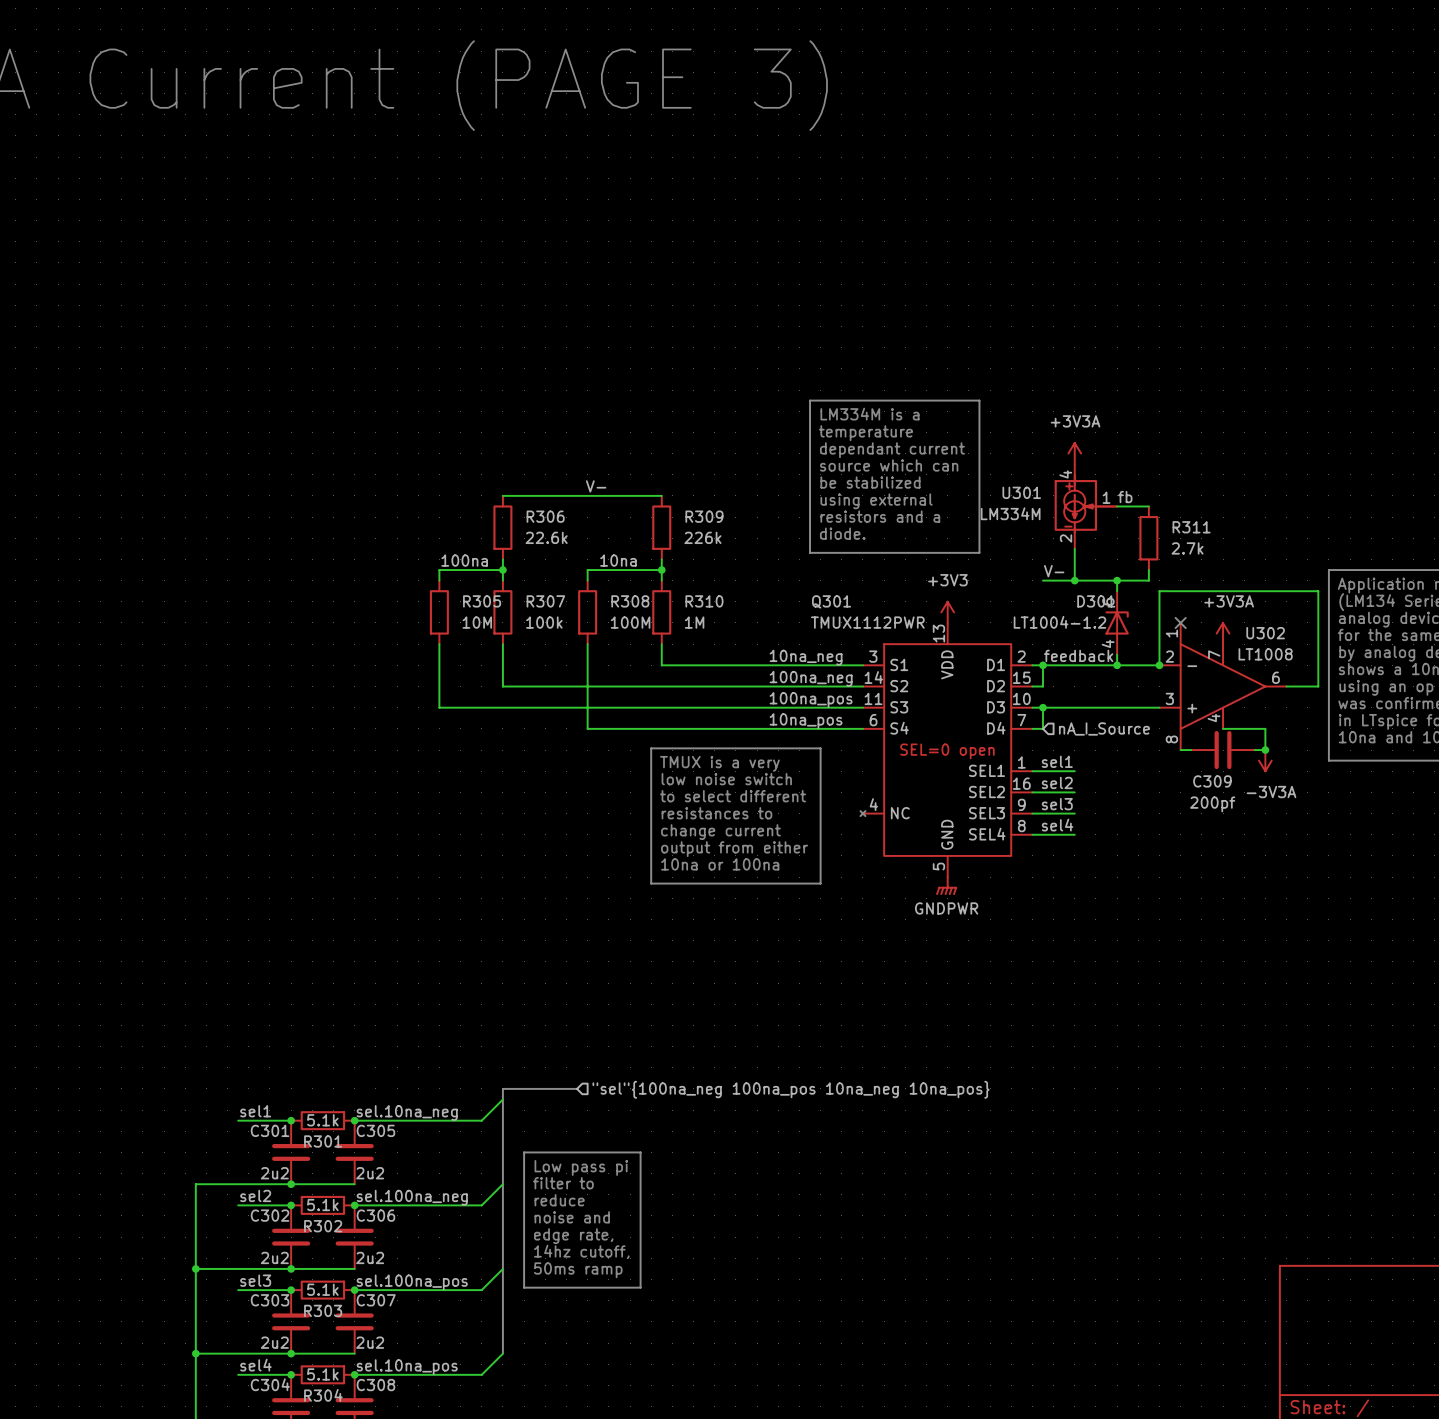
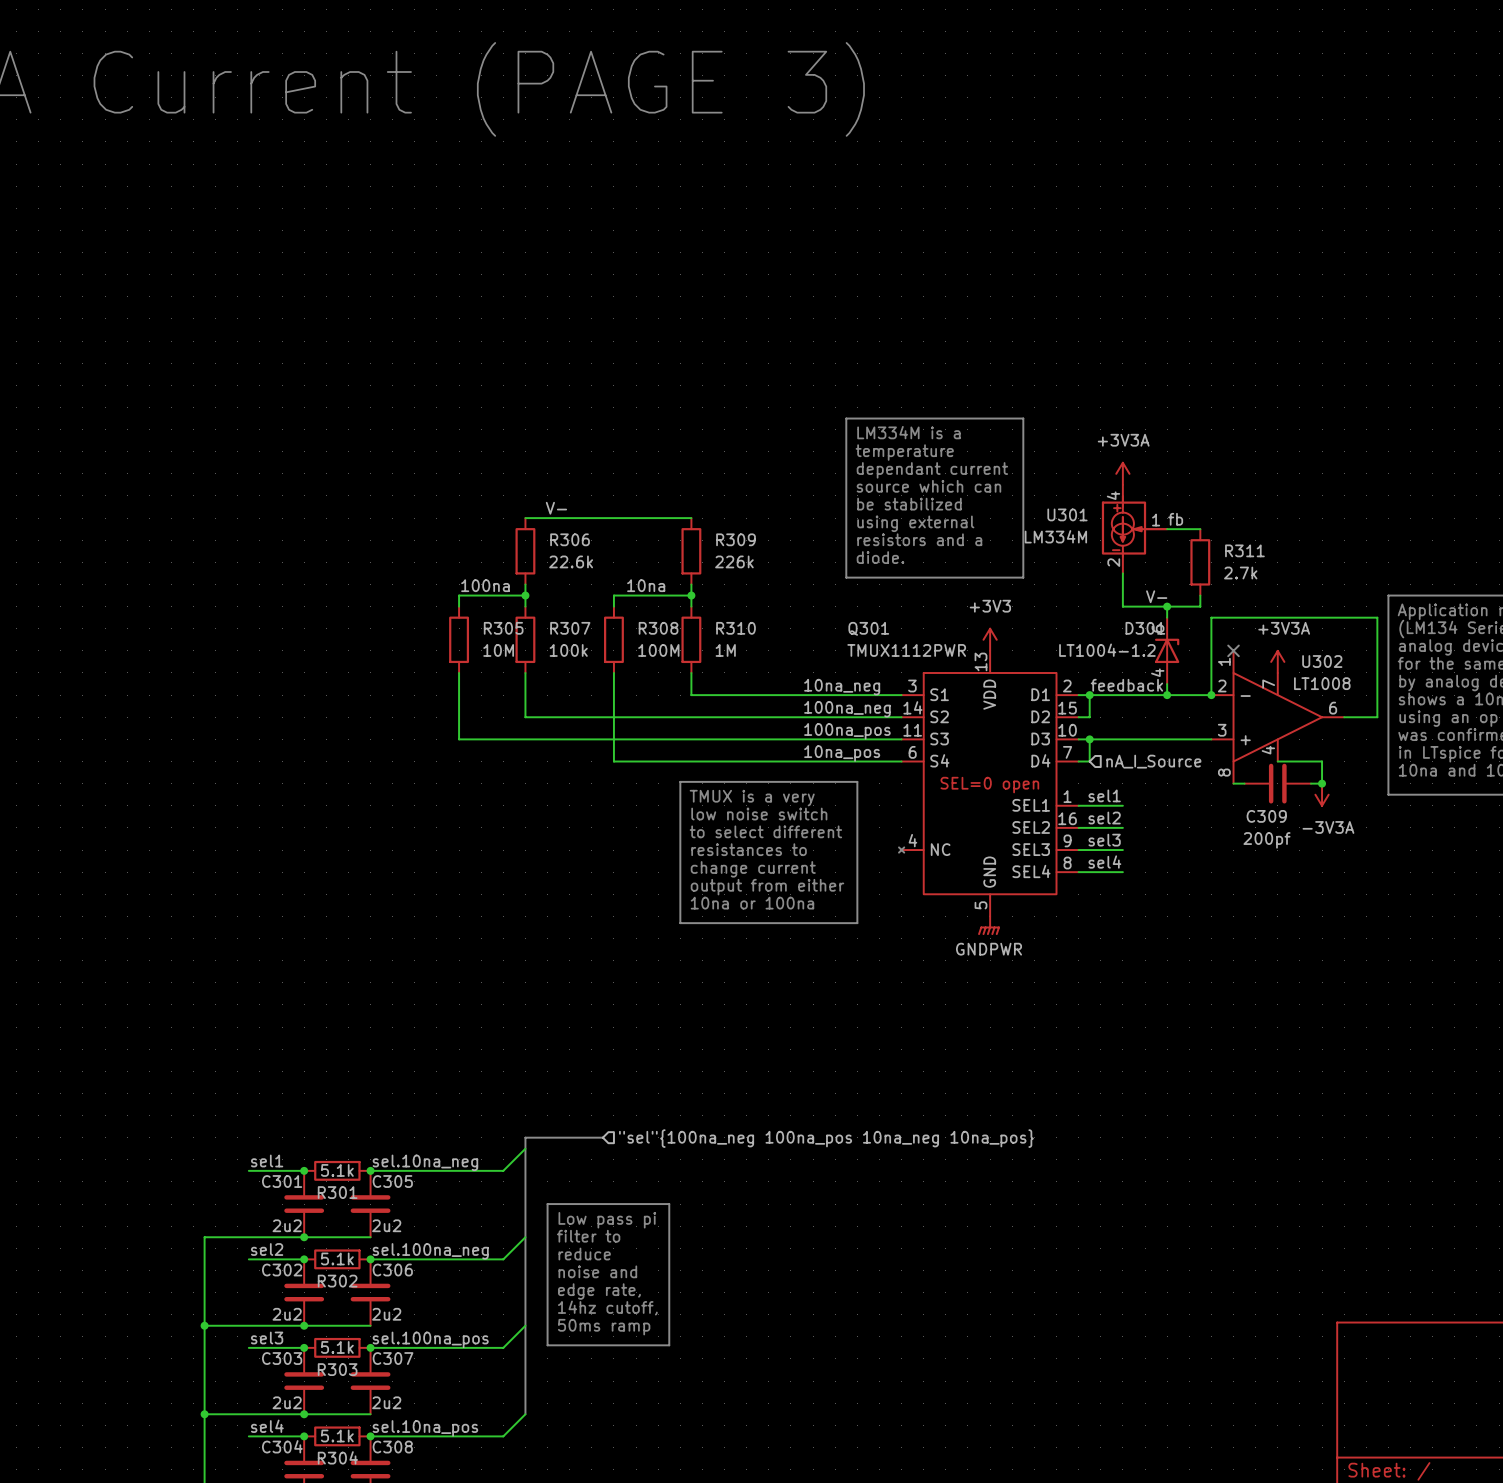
label position: V- (596, 486) -> V- (556, 508)
label position: V- (1054, 571) -> V- (1156, 596)
wire: (1042, 580) (1074, 580) -> none
junction: (1074, 580) -> none

